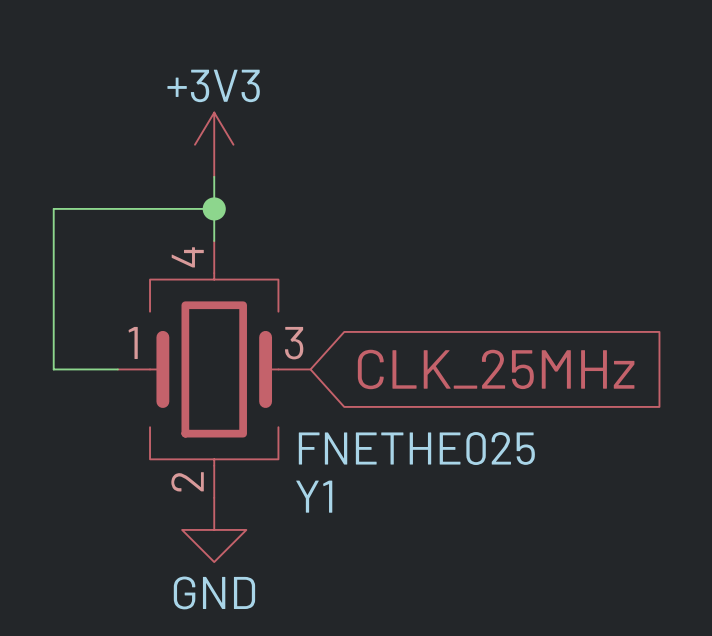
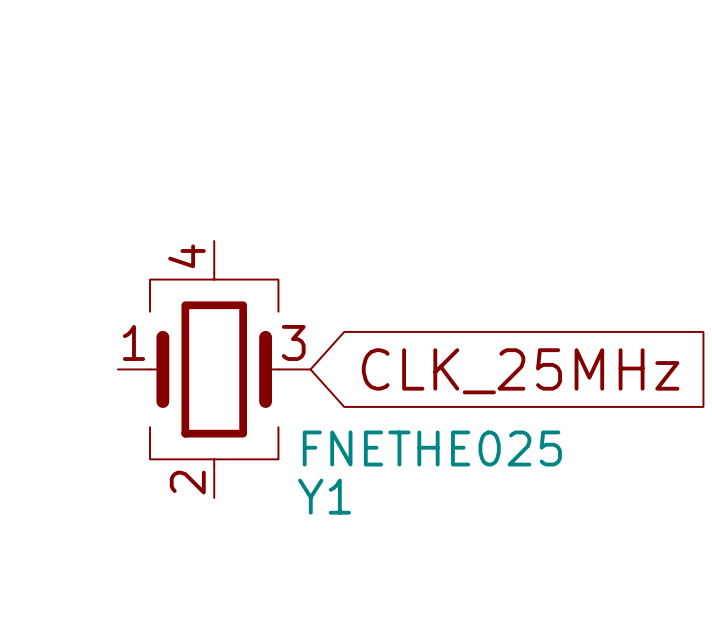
power symbol: +3V3 (214, 144) -> none
wire: (214, 176) (214, 241) -> none
wire: (214, 208) (53, 208) (53, 369) (117, 369) -> none
junction: (214, 208) -> none
power symbol: GND (214, 529) -> none

